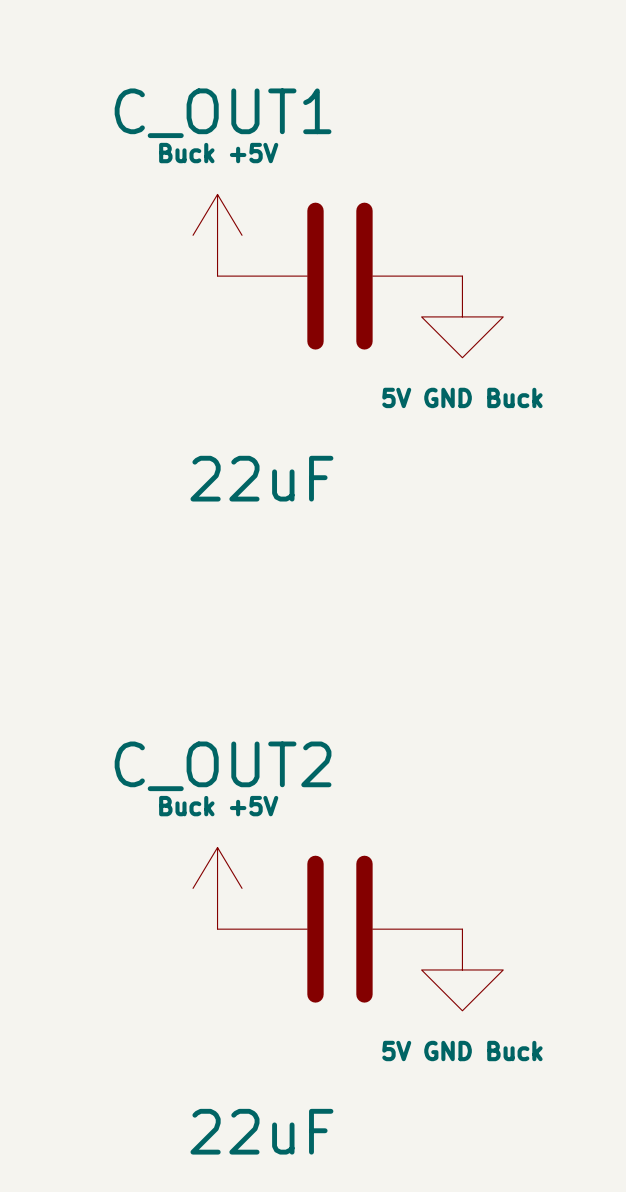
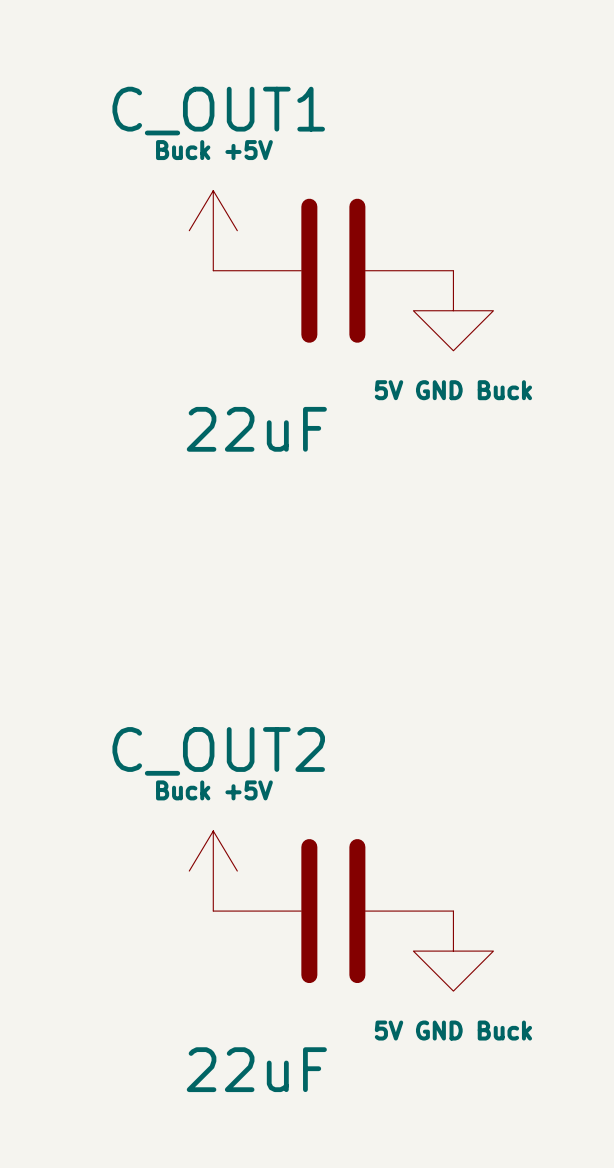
C_OUT1 value position: 22uF (261, 478) -> 22uF (256, 429)
C_OUT2 value position: 22uF (261, 1131) -> 22uF (256, 1069)

